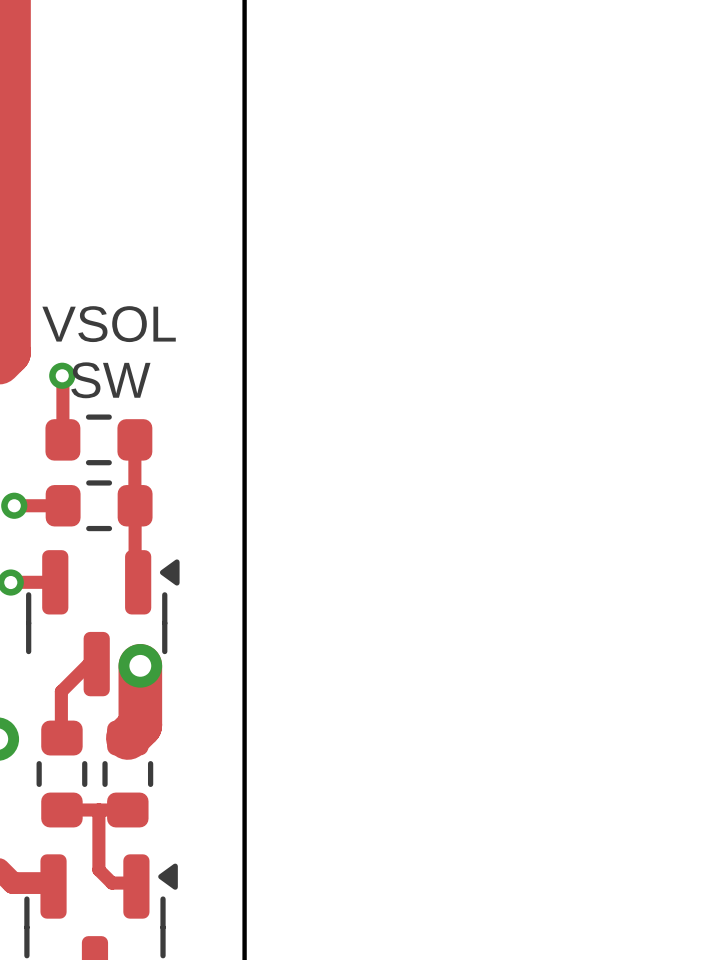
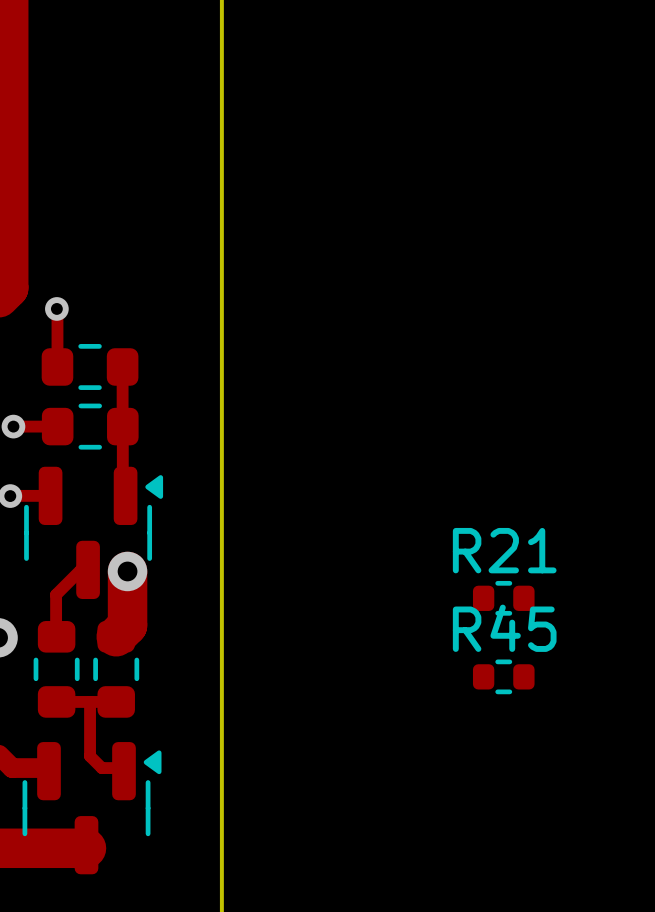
text: VSOL (109, 324) -> none
text: SW (110, 380) -> none
R21: none -> (503, 598)
R45: none -> (503, 676)

